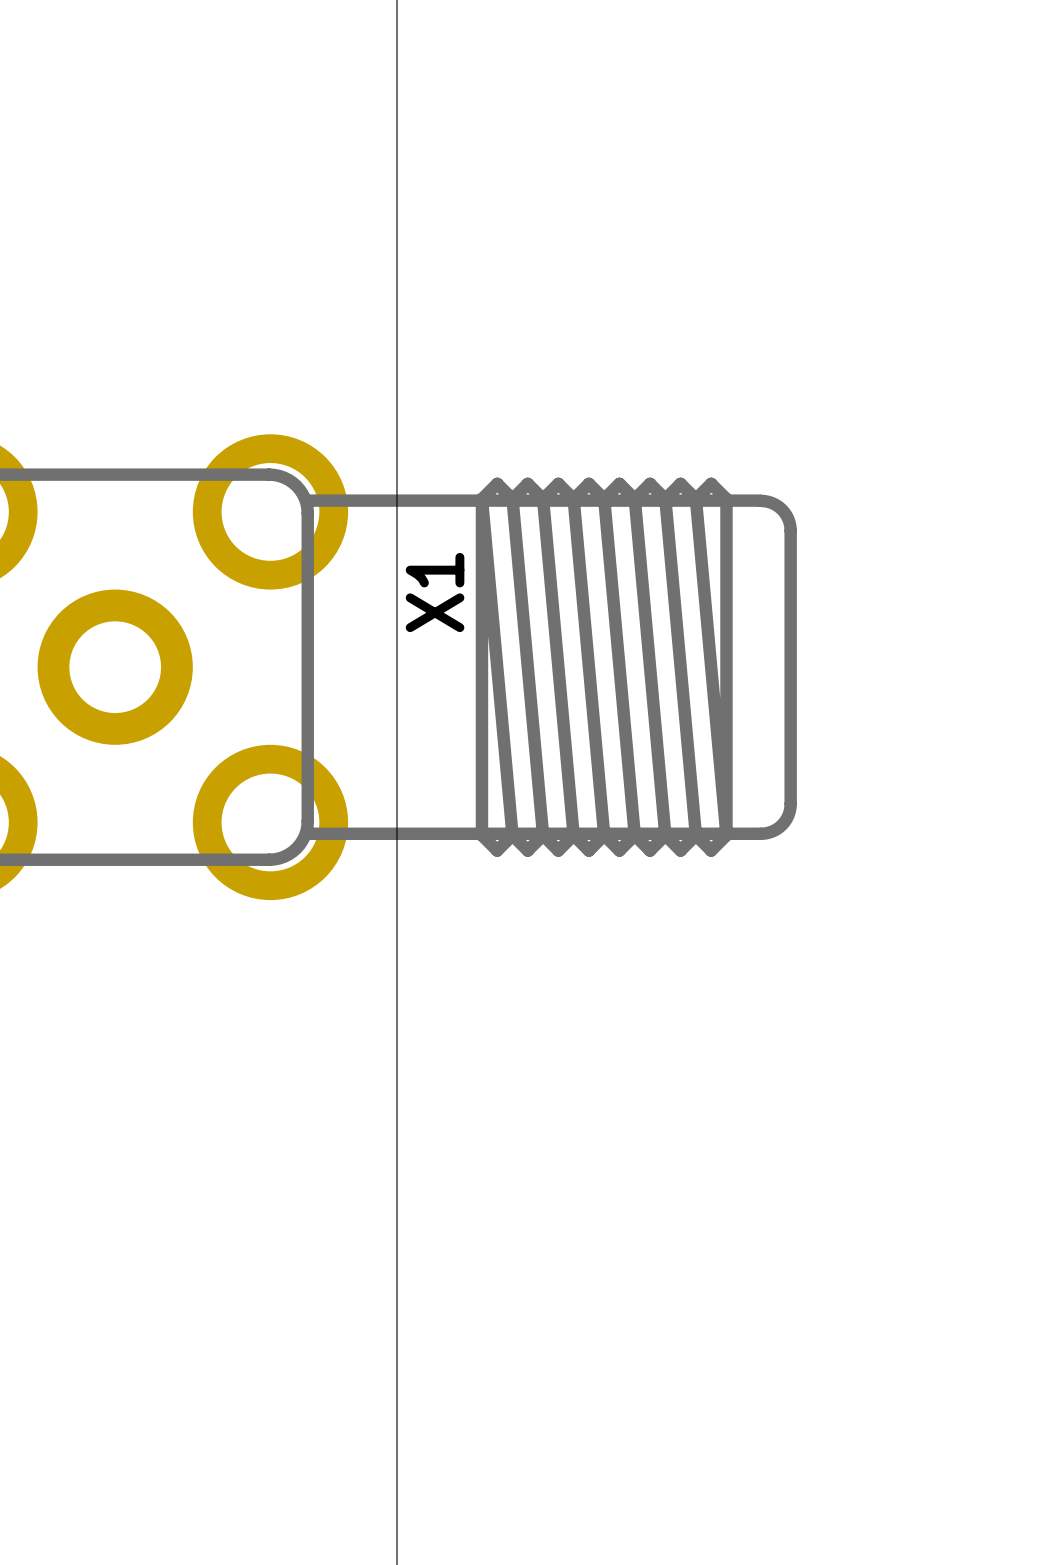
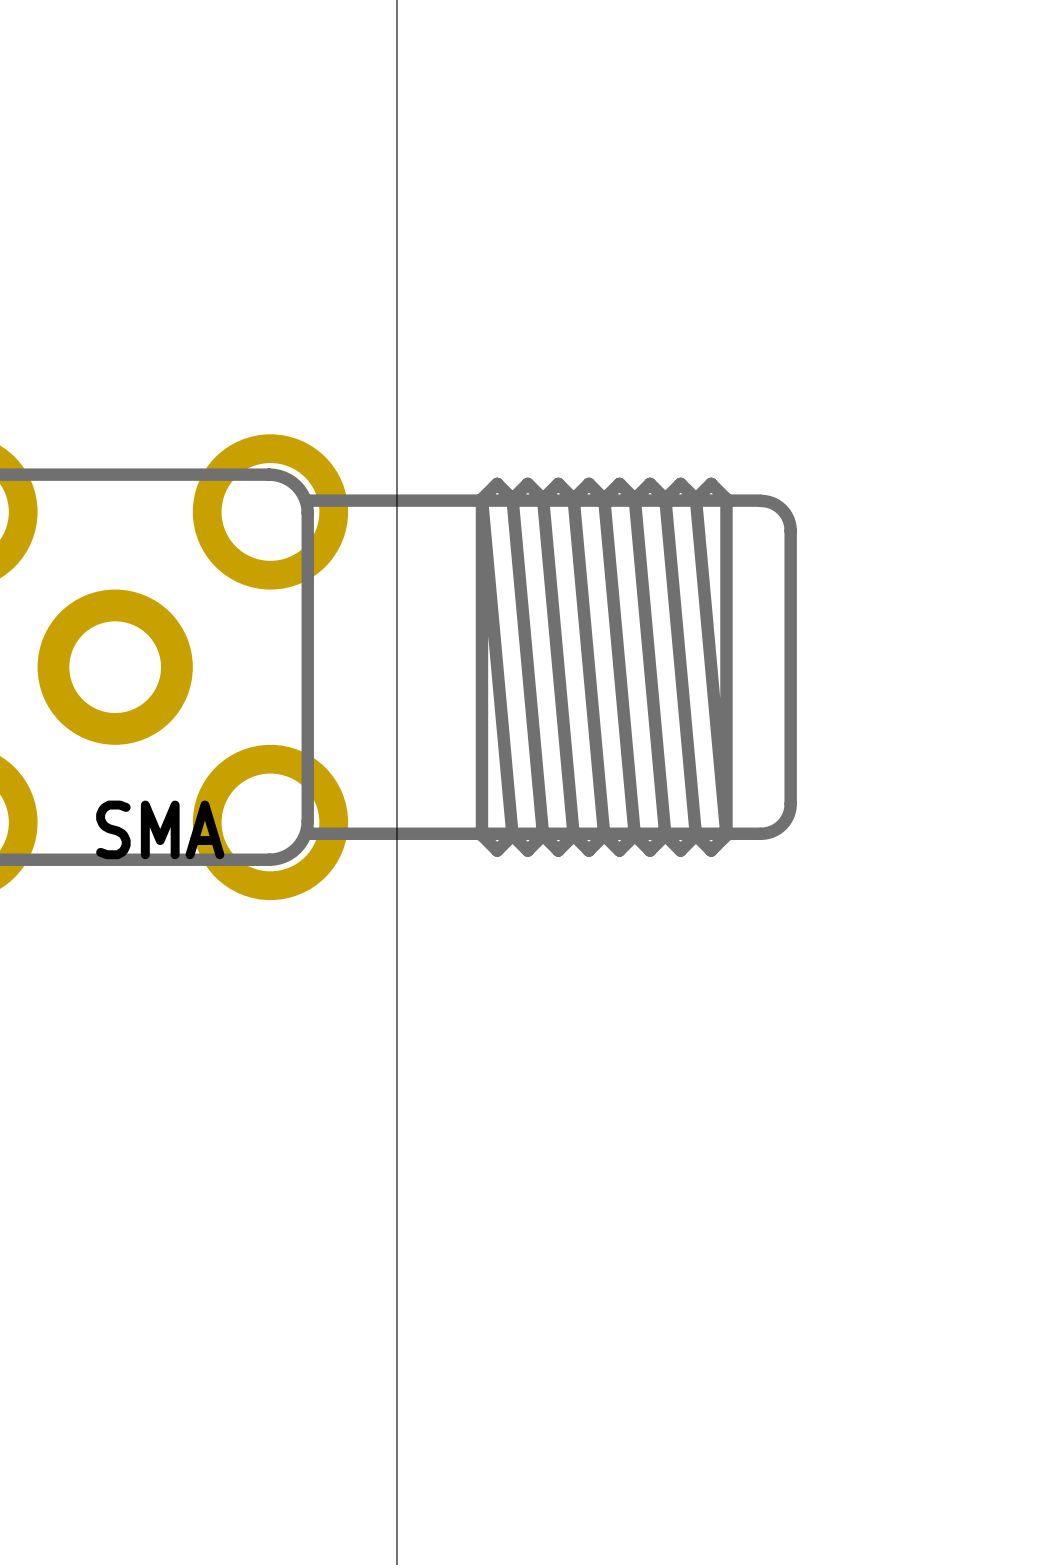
X1 name: X1 (435, 592) -> SMA (160, 829)

